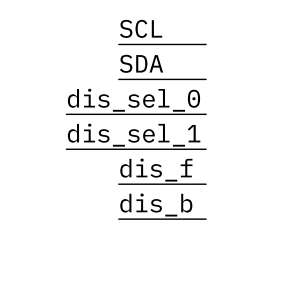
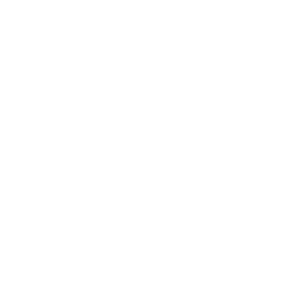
label: SCL (141, 28) -> none
wire: (118, 44) (206, 44) -> none
label: SDA (141, 63) -> none
wire: (118, 79) (206, 79) -> none
label: dis_sel_0 (133, 100) -> none
wire: (66, 114) (206, 114) -> none
label: dis_sel_1 (134, 135) -> none
wire: (66, 149) (206, 149) -> none
label: dis_f (156, 170) -> none
wire: (118, 184) (206, 184) -> none
label: dis_b (156, 205) -> none
wire: (118, 219) (206, 219) -> none

